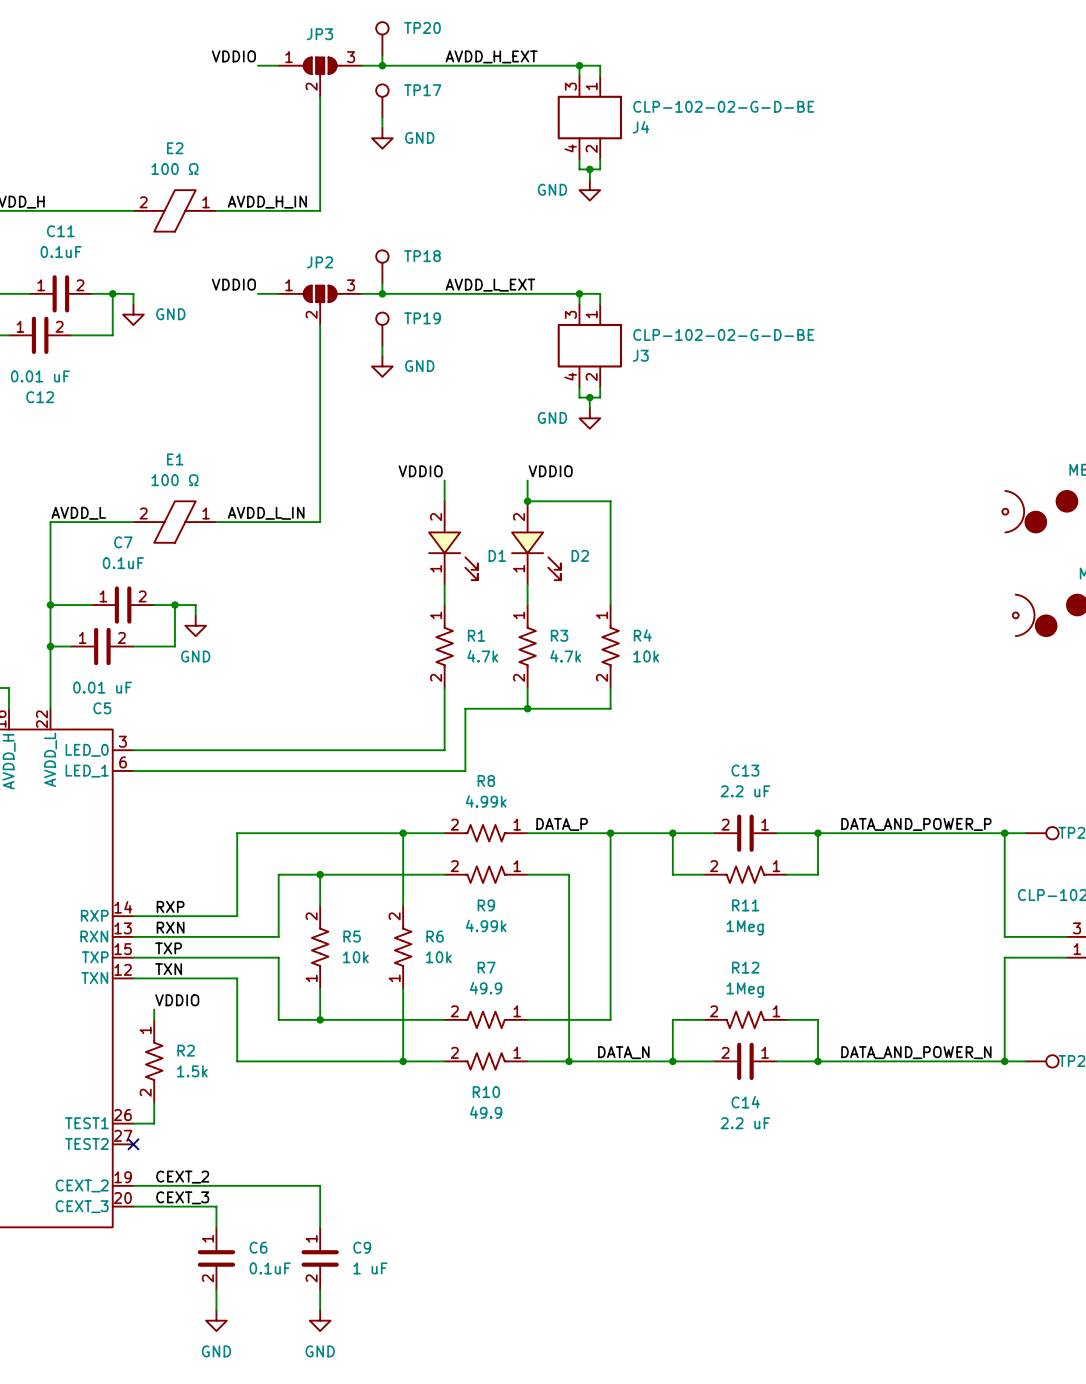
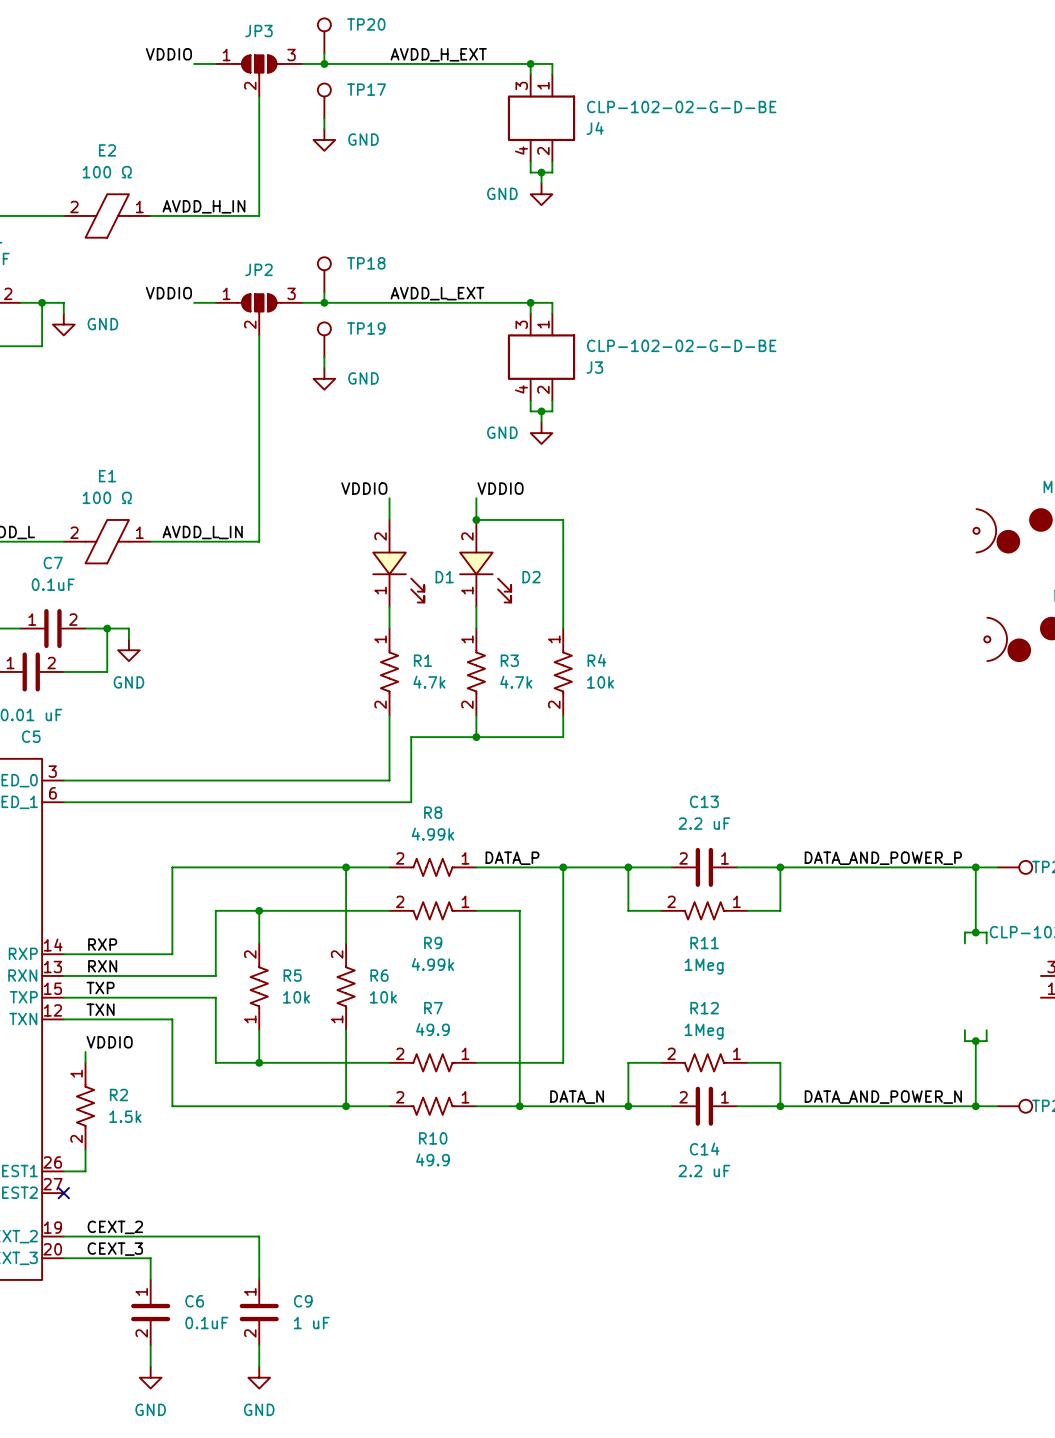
wire: (1004, 895) (1004, 936) (1066, 936) -> none
junction: none -> (975, 932)
wire: none -> (964, 943) (964, 932) (986, 932) (986, 943)
wire: (1066, 957) (1004, 957) (1004, 999) -> none
wire: none -> (964, 1030) (964, 1041) (986, 1041) (986, 1030)
junction: none -> (975, 1041)

